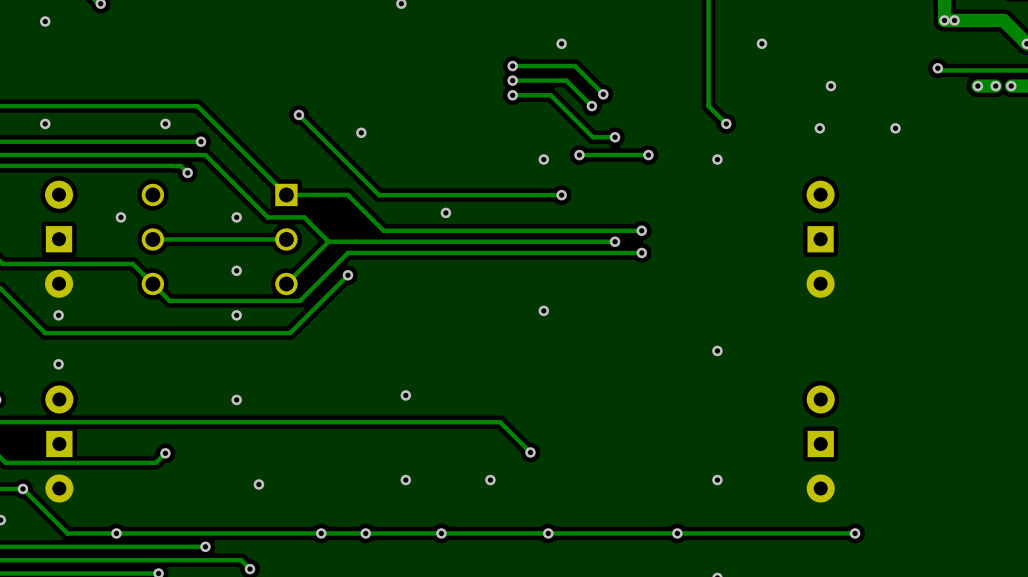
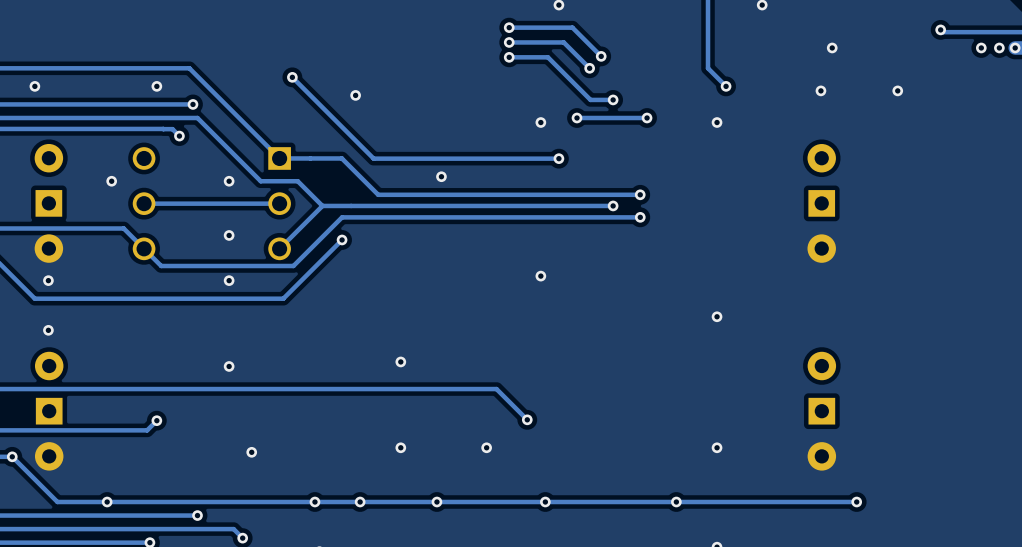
track: (995, 86) (977, 86) -> none

